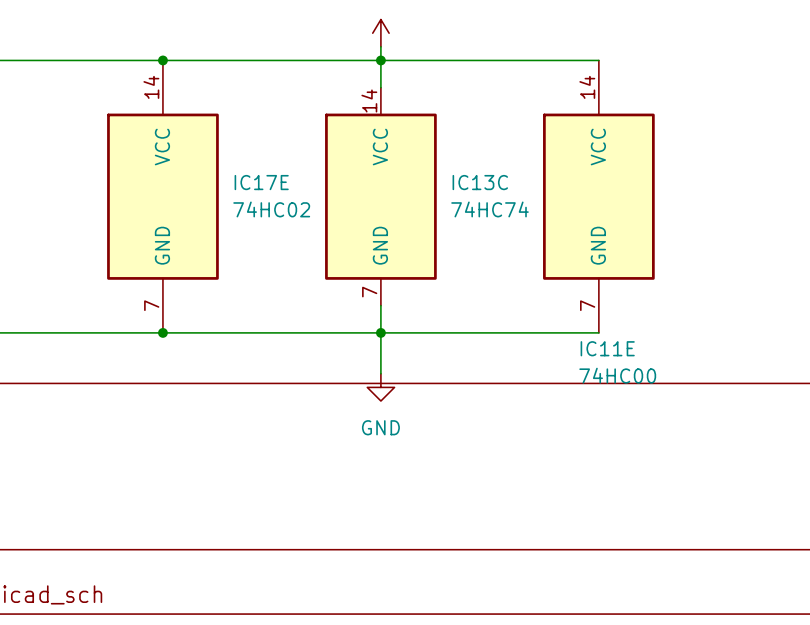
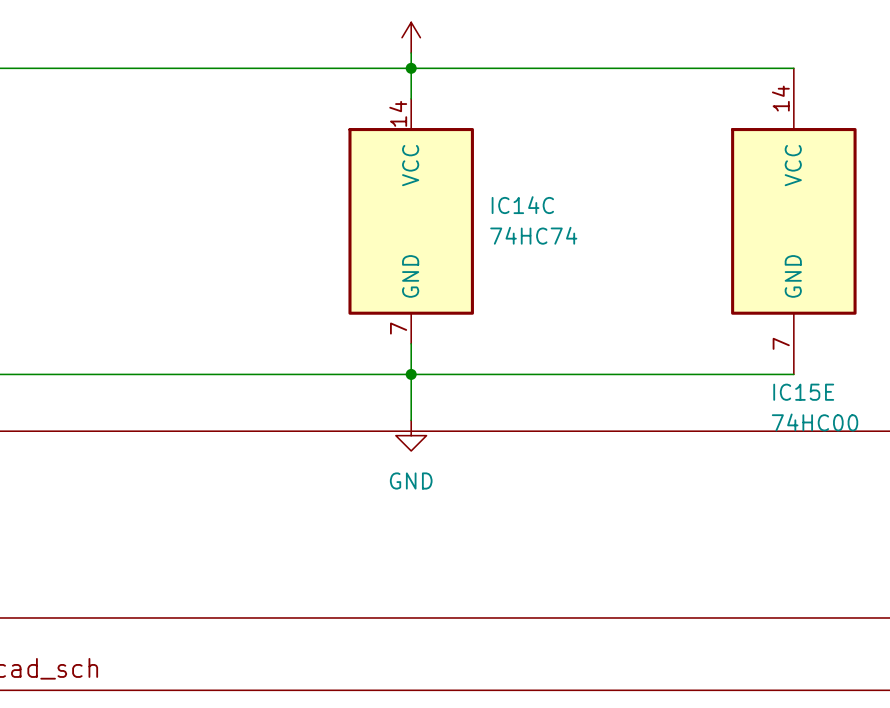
junction: (162, 60) -> none
wire: none -> (656, 68) (793, 68)
IC13C name: IC13C (480, 182) -> IC14C (522, 205)
IC17E: 74HC02 (162, 196) -> none
IC11E: 74HC00 (598, 196) -> none
IC15E: none -> 74HC00 (793, 221)
junction: (162, 332) -> none
wire: none -> (656, 374) (793, 374)

